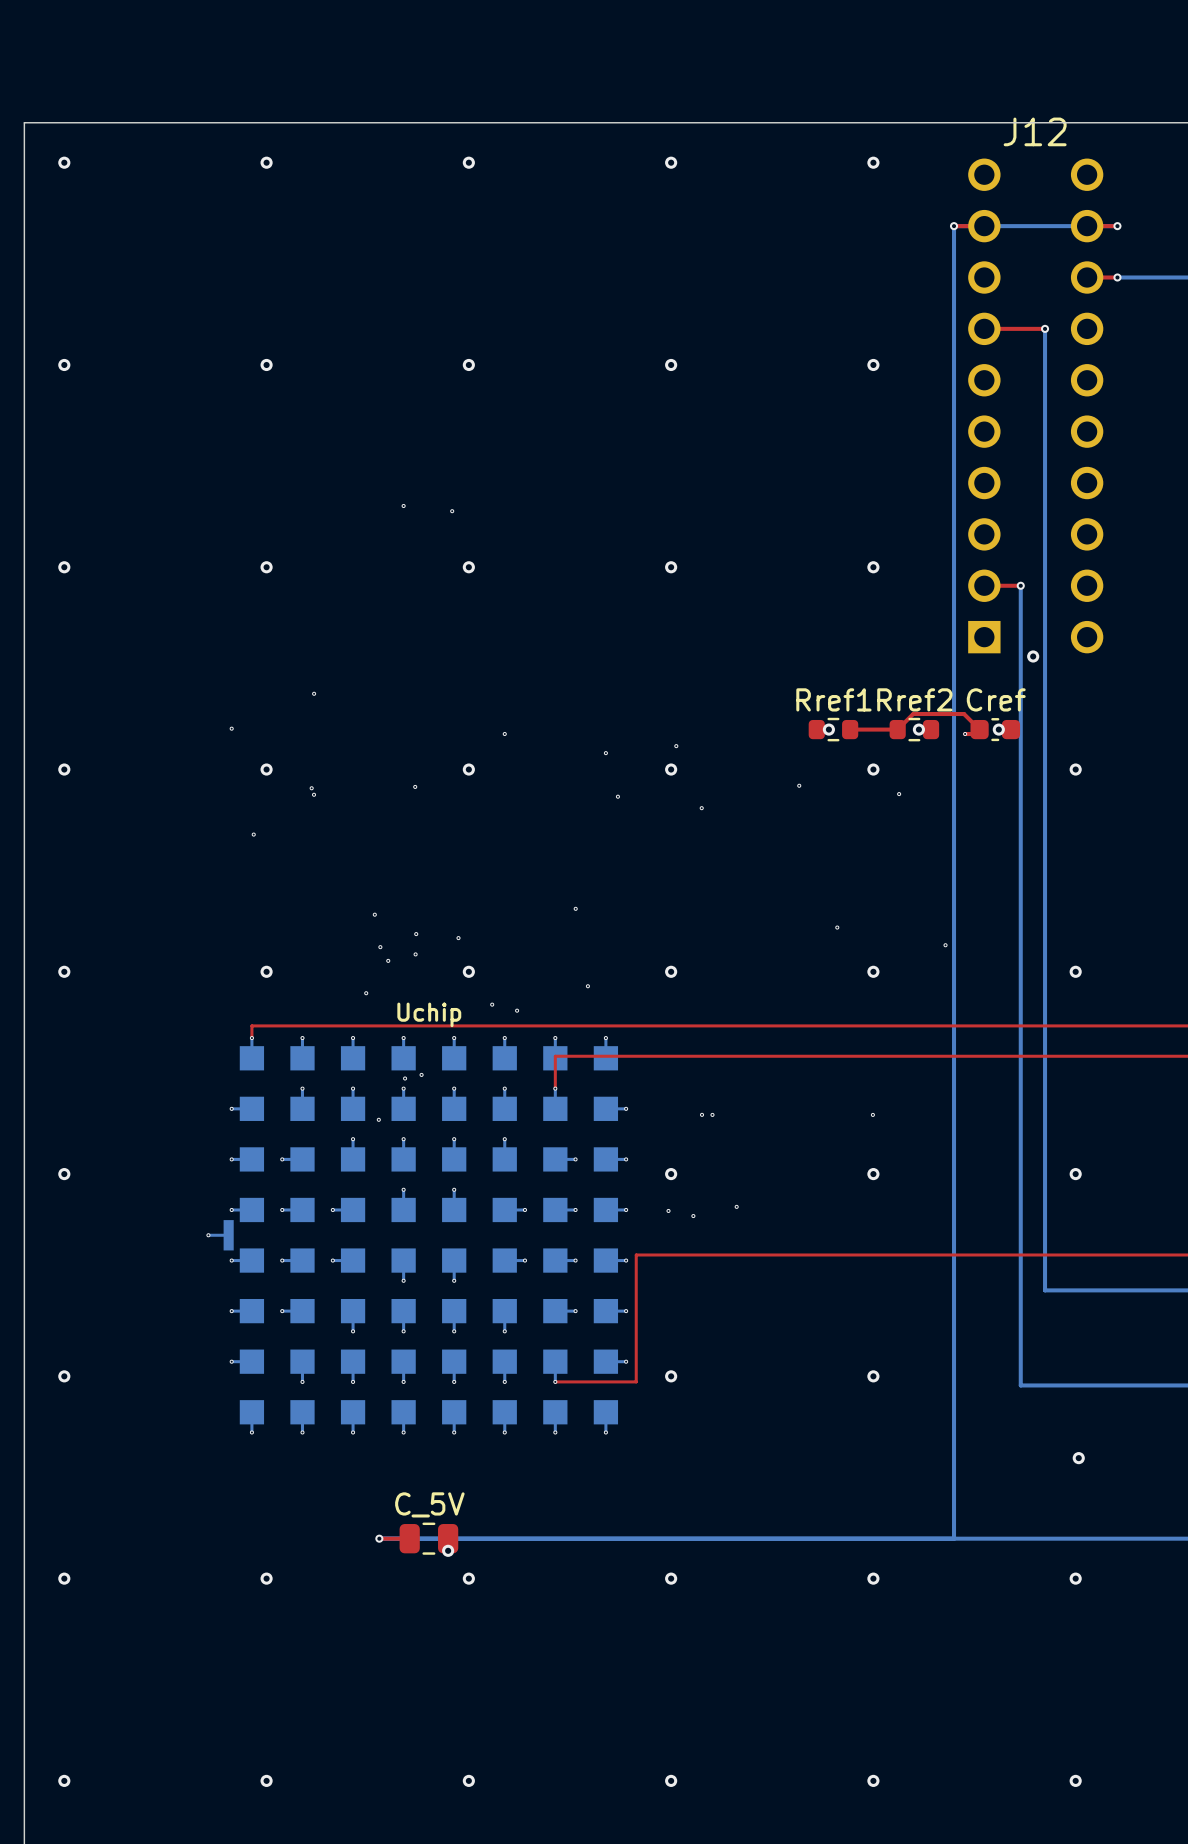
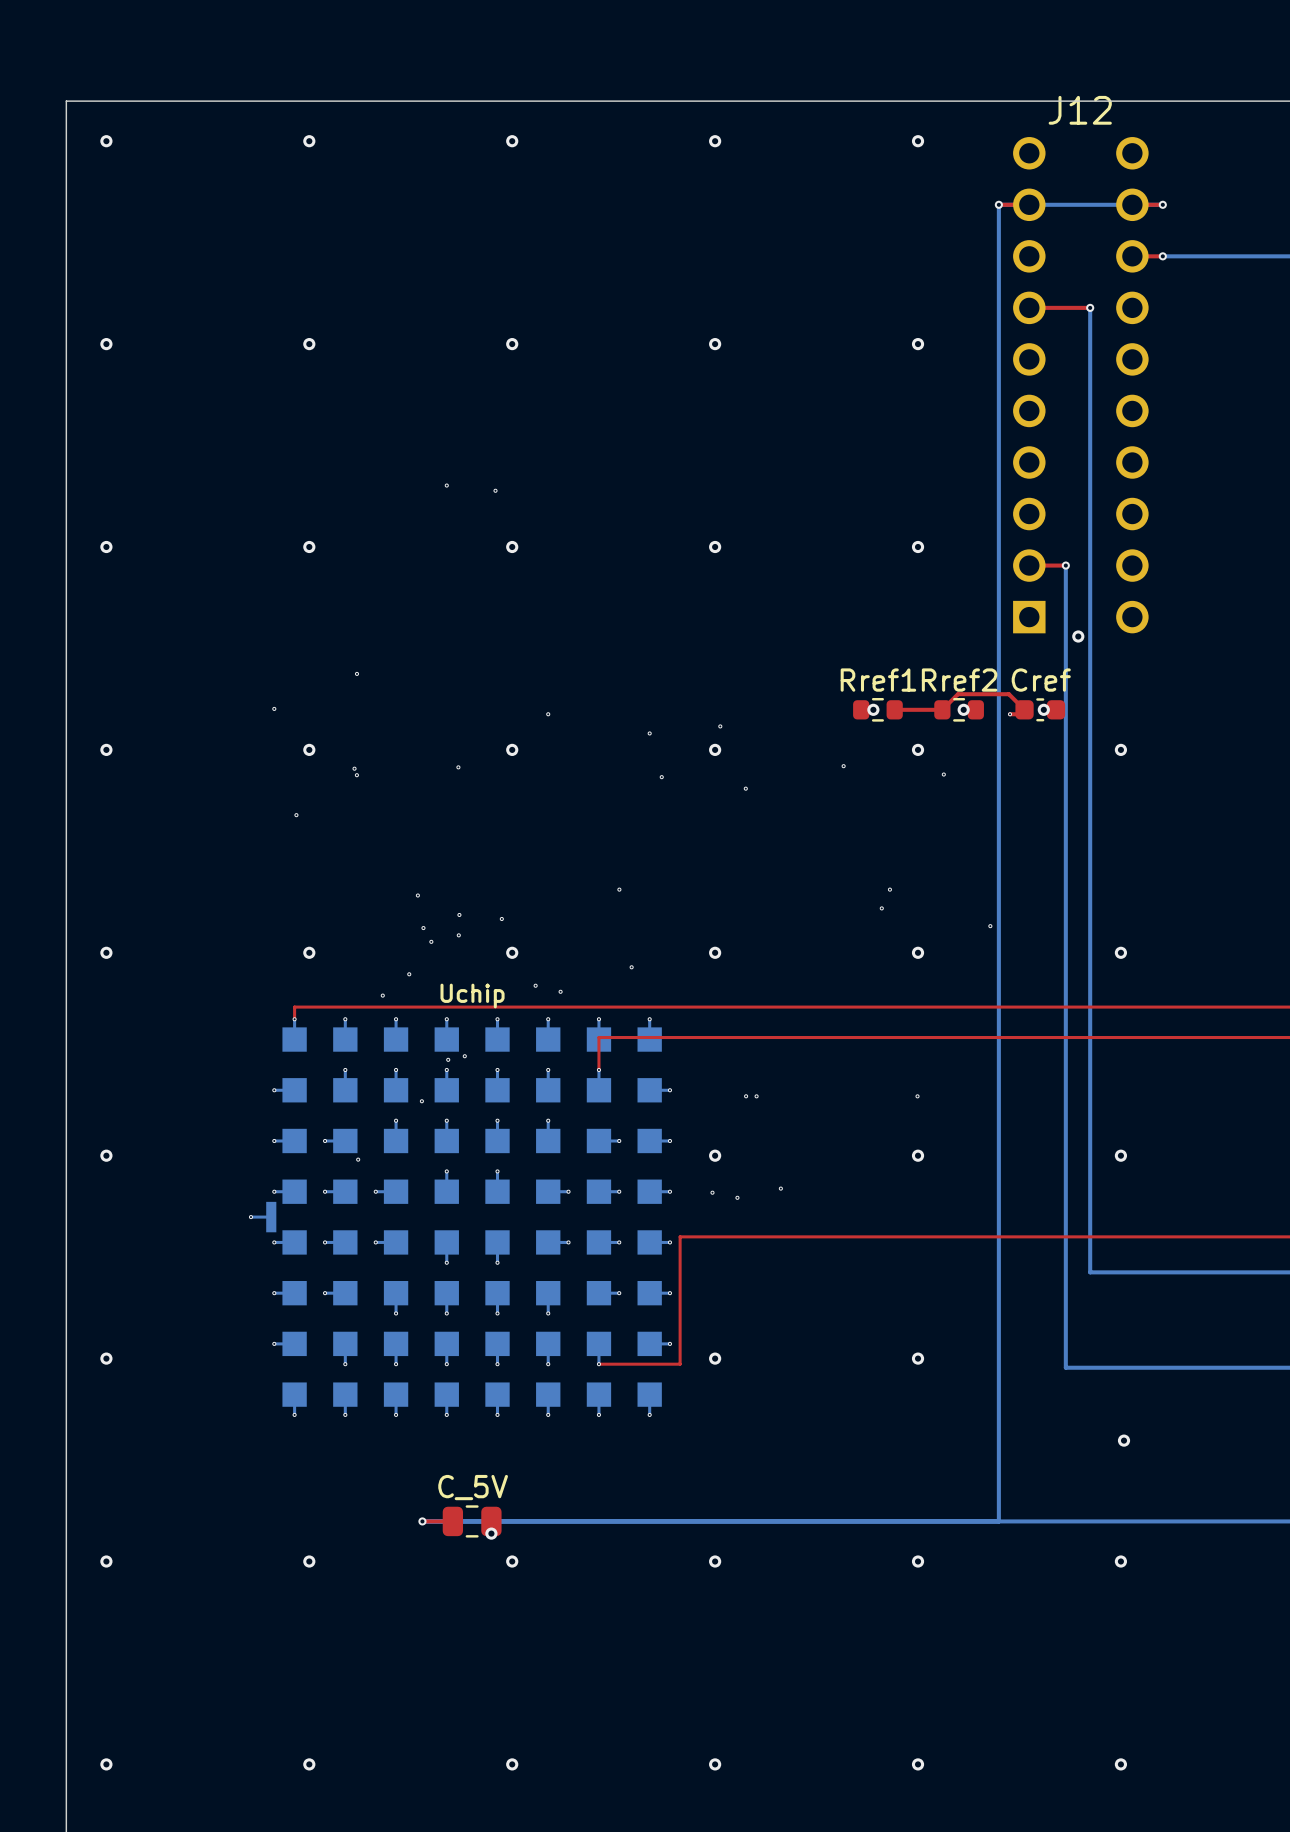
via: none -> (889, 889)
via: none -> (382, 995)
via: none -> (358, 1159)

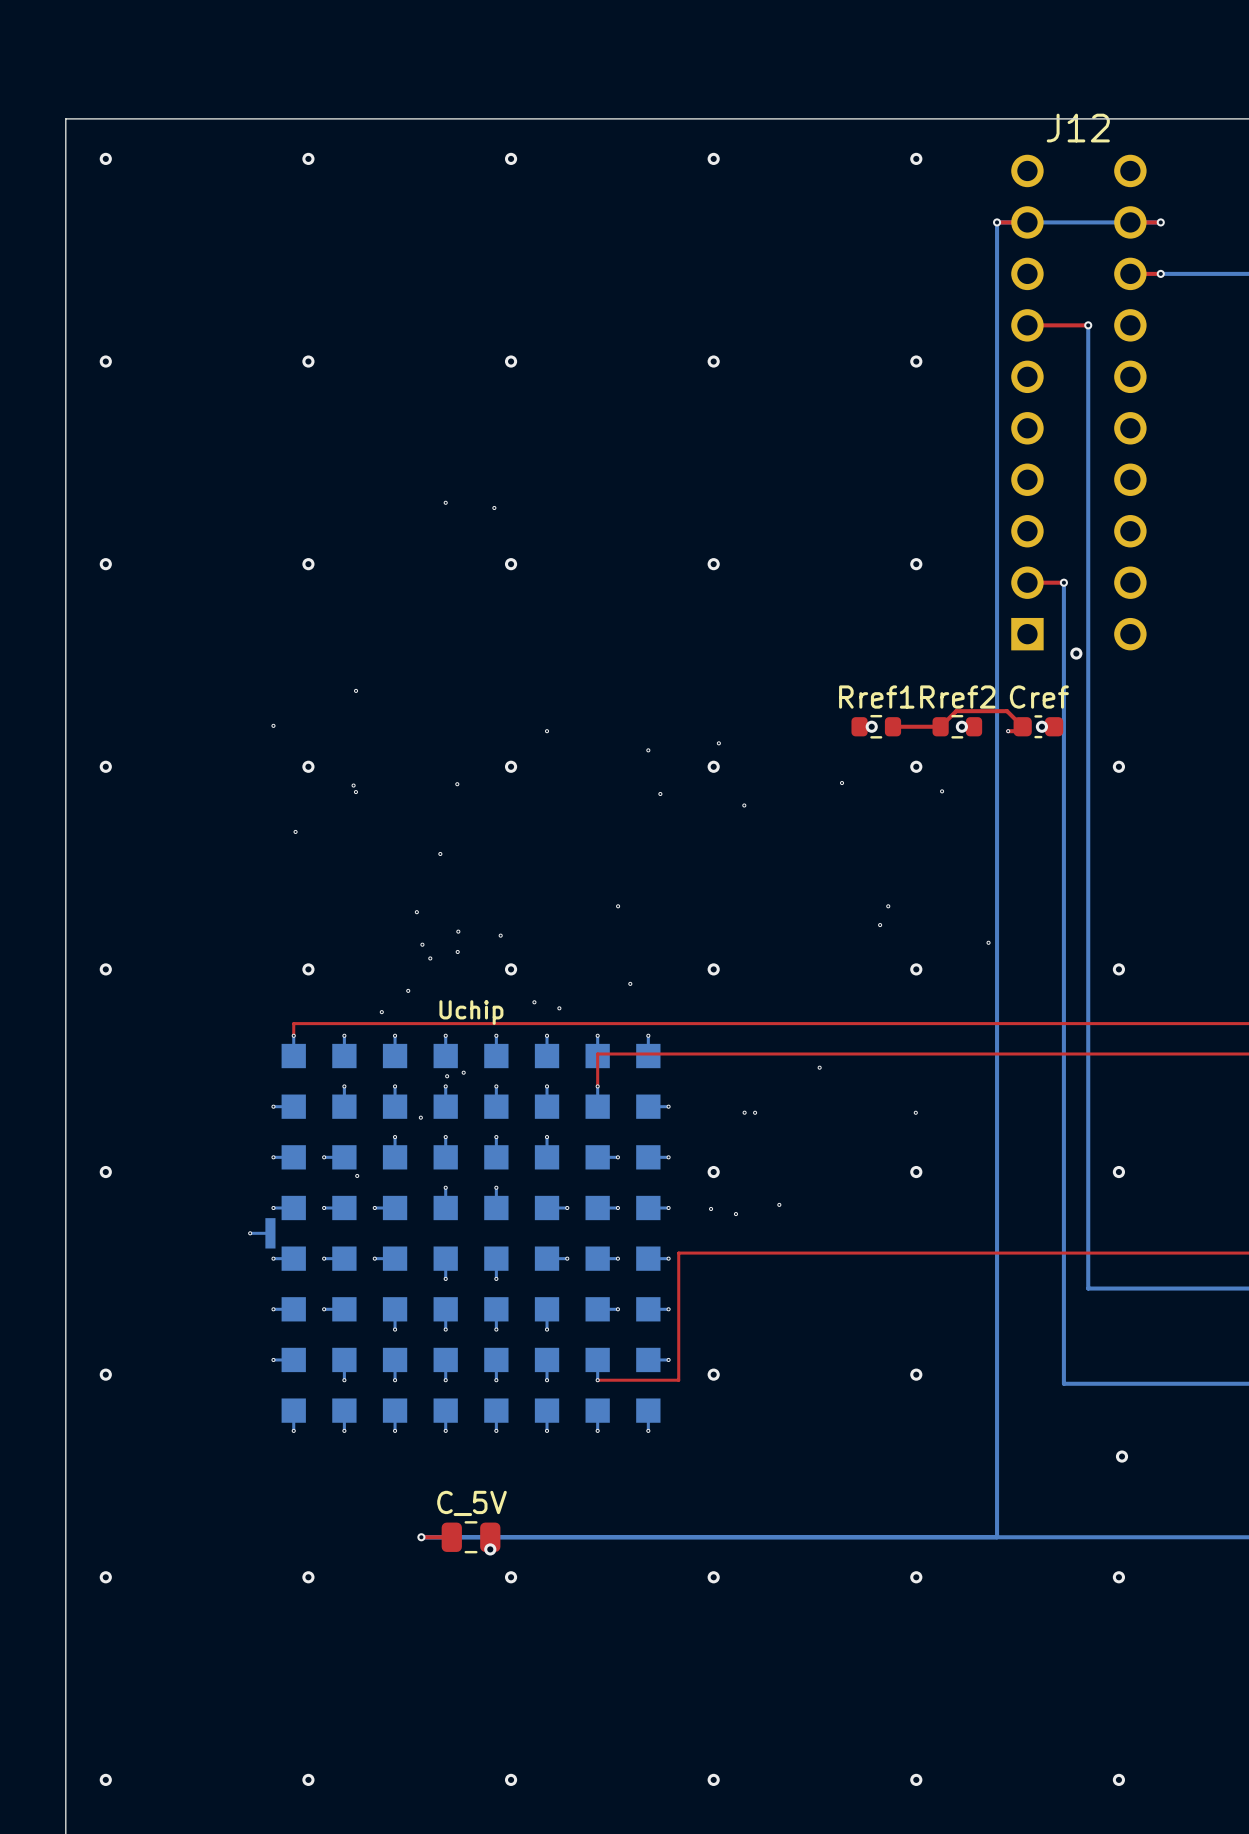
via: none -> (440, 853)
via: none -> (819, 1067)

